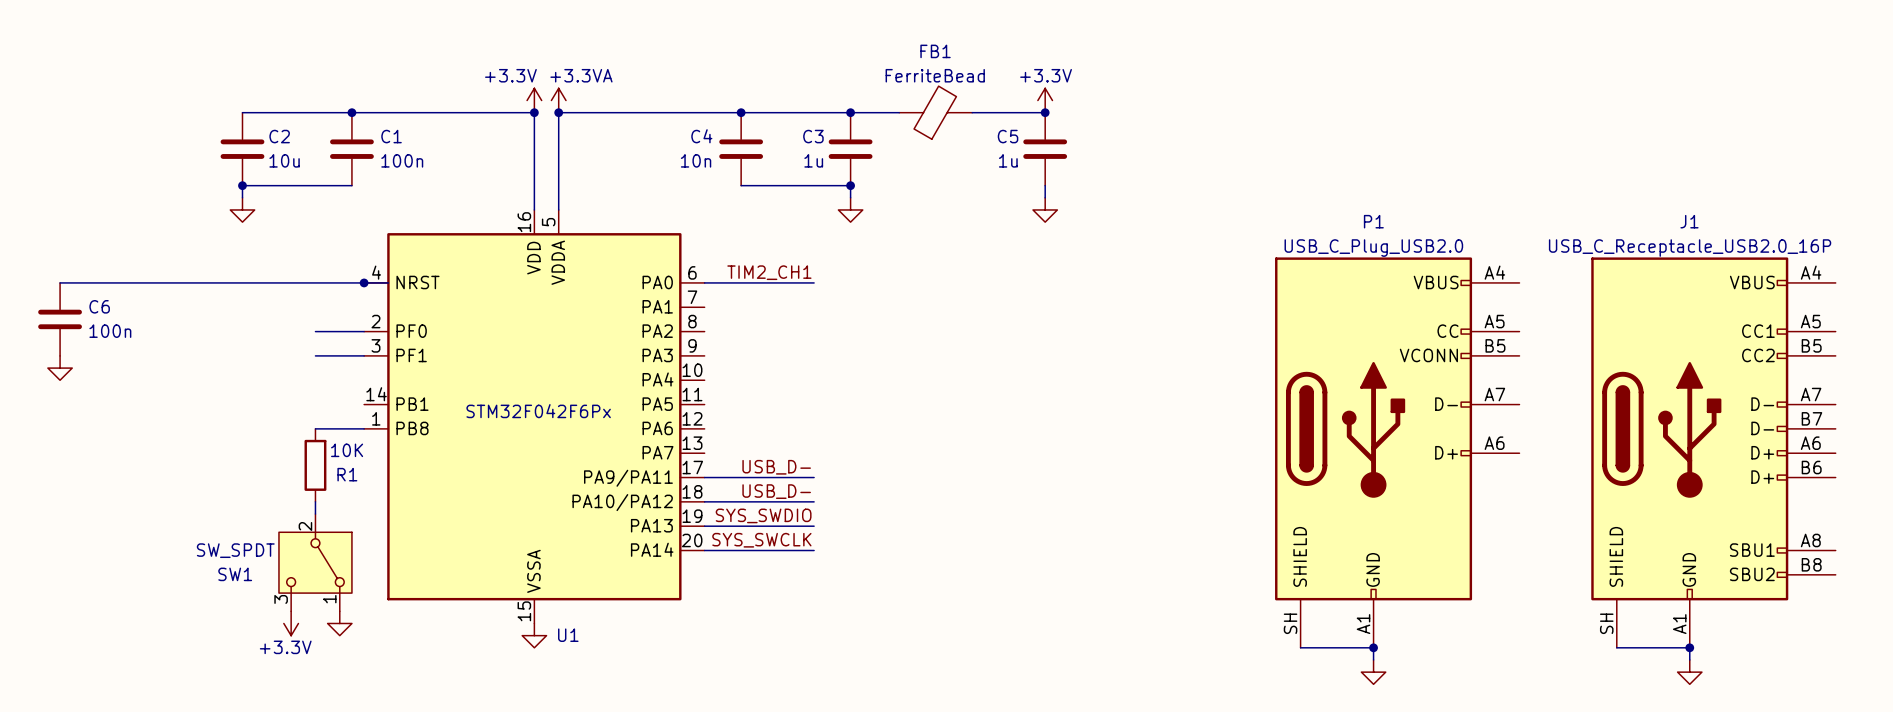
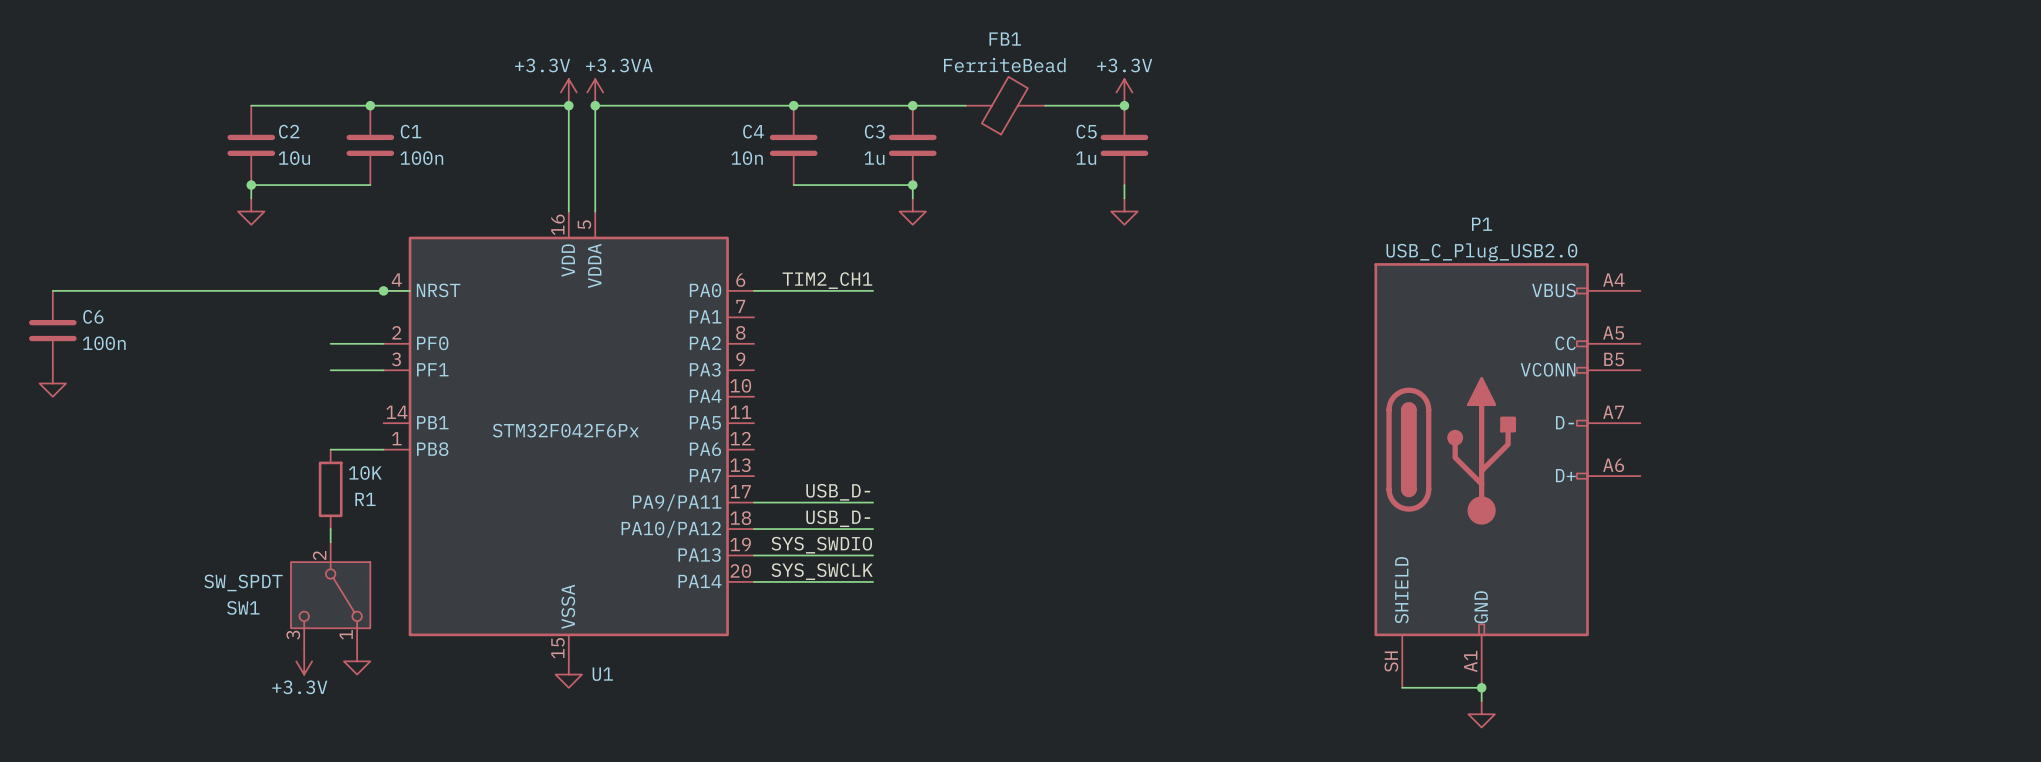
J1: USB_C_Receptacle_USB2.0_16P (1713, 452) -> none
wire: (1616, 647) (1689, 647) (1689, 659) -> none
junction: (1689, 647) -> none
power symbol: (1689, 672) -> none

